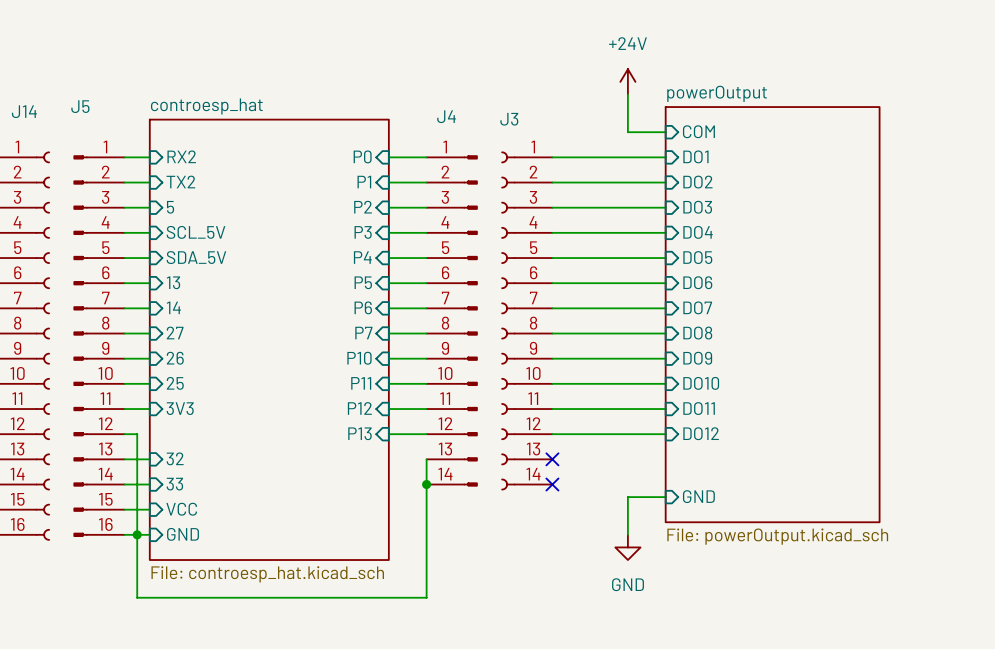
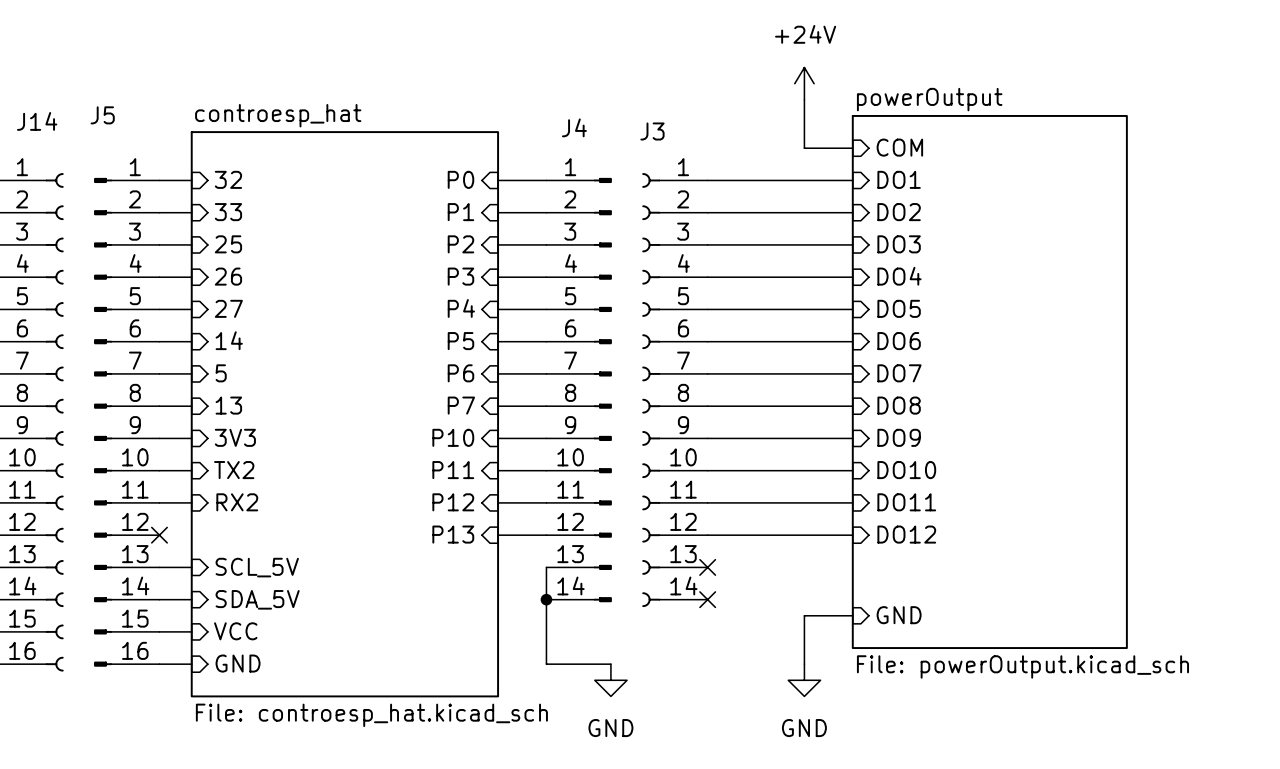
sheet pin: RX2 (181, 156) -> 32 (228, 179)
sheet pin: TX2 (180, 181) -> 33 (228, 212)
sheet pin: 5 (170, 207) -> 25 (228, 244)
sheet pin: SCL_5V (196, 232) -> 26 (228, 276)
sheet pin: SDA_5V (196, 257) -> 27 (228, 308)
sheet pin: 13 (173, 282) -> 14 (229, 340)
sheet pin: 14 (173, 307) -> 5 (221, 373)
sheet pin: 27 (175, 332) -> 13 (228, 405)
sheet pin: 26 (175, 358) -> 3V3 (235, 437)
sheet pin: 25 (175, 383) -> TX2 (234, 470)
sheet pin: 3V3 (180, 408) -> RX2 (237, 502)
wire: (124, 434) (137, 434) (137, 597) (426, 597) (426, 534) -> (610, 664) (546, 664)
no-connect mark: none -> (159, 535)
sheet pin: 32 (175, 458) -> SCL_5V (257, 567)
sheet pin: 33 (174, 484) -> SDA_5V (257, 599)
junction: (137, 534) -> none
power symbol: none -> GND (610, 680)

